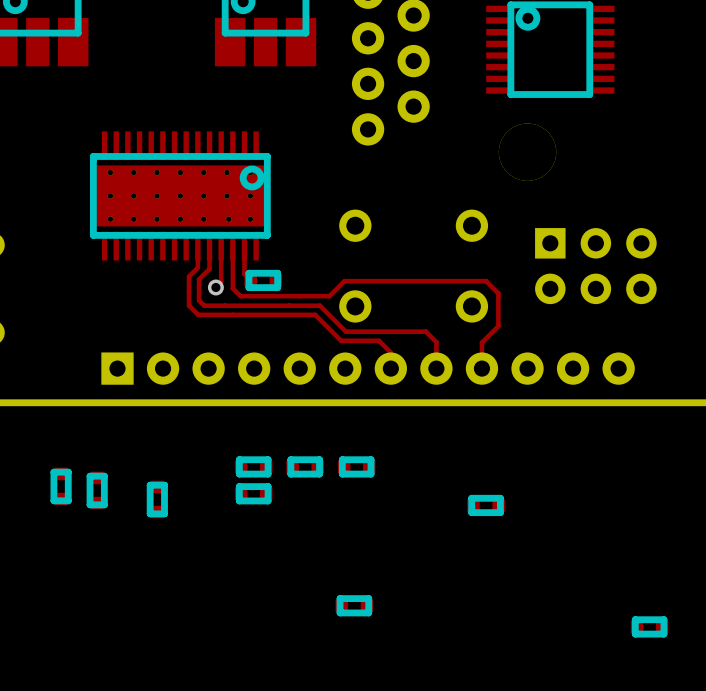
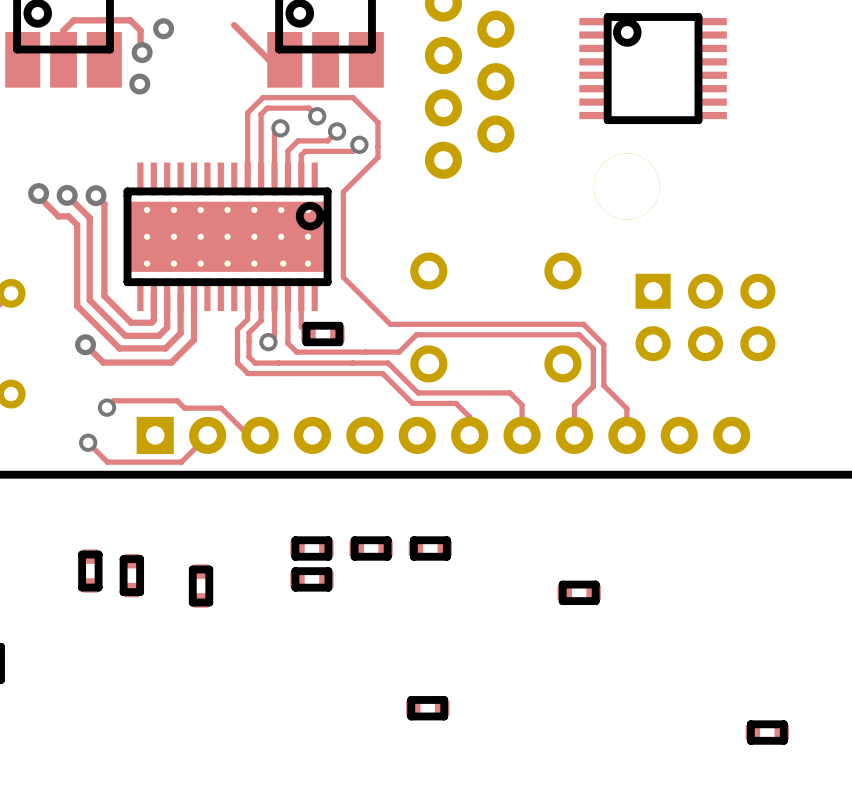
track: none -> (234, 25) (268, 59) (284, 59)
via: none -> (163, 28)
track: none -> (142, 52) (140, 30) (130, 20) (73, 20) (63, 30) (63, 59)
via: none -> (142, 52)
via: none -> (139, 84)
track: none -> (317, 116) (309, 108) (267, 108) (261, 114) (261, 179)
via: none -> (317, 116)
track: none -> (280, 128) (274, 134) (274, 179)
via: none -> (280, 128)
track: none -> (337, 131) (327, 140) (298, 140) (287, 151) (287, 179)
via: none -> (337, 131)
track: none -> (359, 144) (352, 151) (305, 151) (301, 155) (301, 179)
via: none -> (359, 144)
track: none -> (247, 179) (247, 112) (262, 97) (353, 97) (377, 122) (377, 157) (343, 191) (343, 277) (390, 324) (583, 324) (603, 344) (603, 385) (626, 408) (626, 435)
track: none -> (38, 193) (38, 196) (58, 216) (68, 216) (77, 225) (77, 305) (119, 348) (165, 348) (180, 333) (180, 294)
via: none -> (38, 193)
track: none -> (67, 195) (89, 217) (89, 300) (125, 335) (158, 335) (167, 327) (167, 294)
via: none -> (67, 195)
track: none -> (96, 195) (104, 204) (104, 296) (131, 322) (151, 322) (153, 320) (153, 294)
via: none -> (96, 195)
track: none -> (194, 294) (194, 340) (171, 362) (103, 362) (85, 344)
via: none -> (85, 344)
track: none -> (107, 407) (113, 400) (177, 400) (184, 408) (221, 408) (248, 435) (260, 435)
via: none -> (107, 407)
track: none -> (207, 435) (181, 462) (107, 462) (88, 442)
via: none -> (88, 442)

